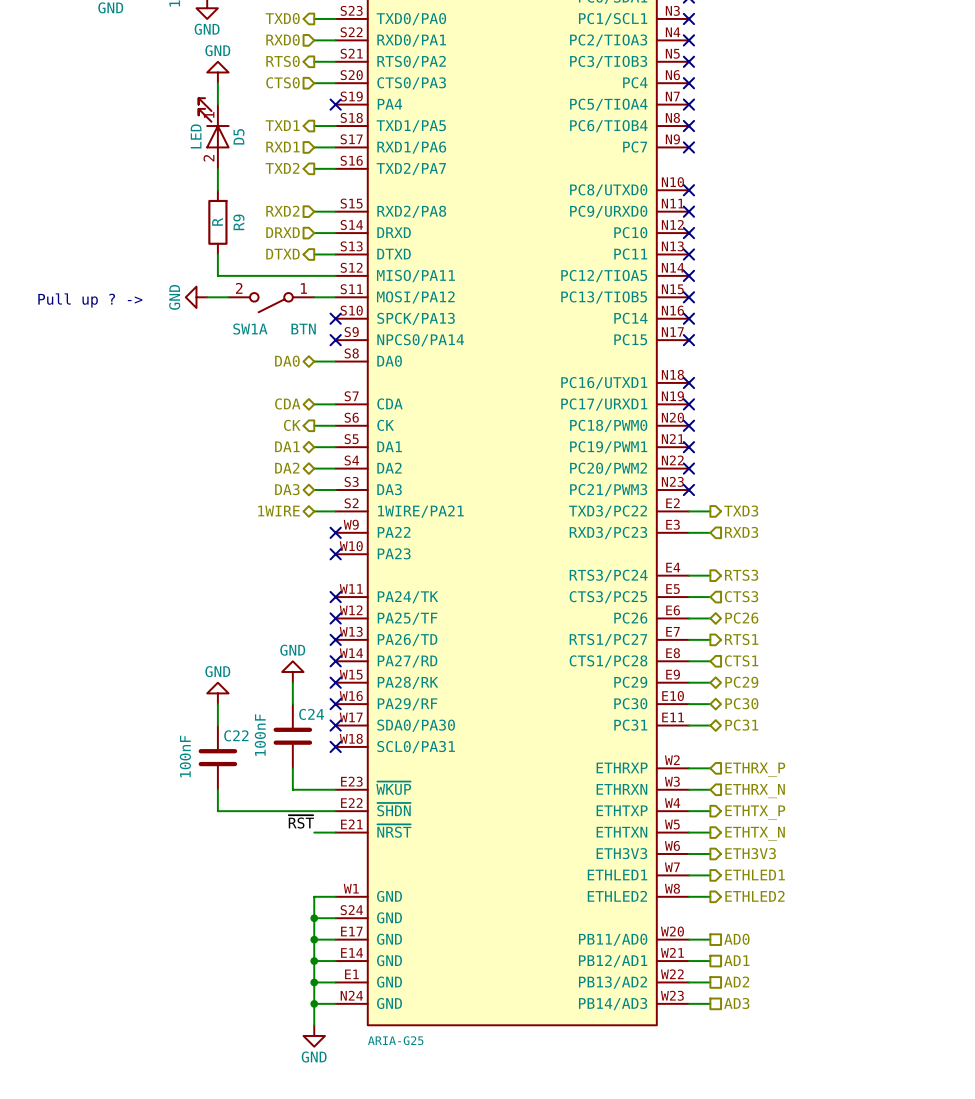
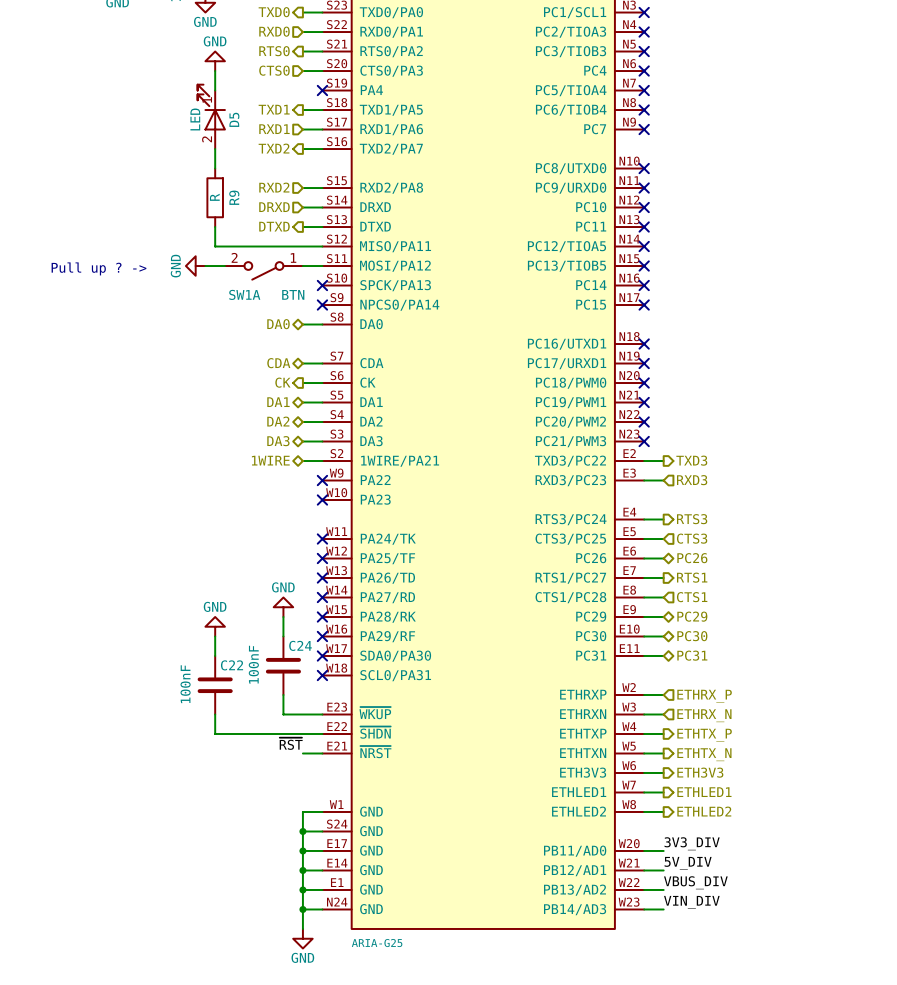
label: none -> 3V3_DIV (692, 843)
hierarchical label: AD0 (736, 939) -> none
label: none -> 5V_DIV (688, 863)
hierarchical label: AD1 (736, 960) -> none
label: none -> VBUS_DIV (695, 882)
hierarchical label: AD2 (736, 981) -> none
label: none -> VIN_DIV (691, 902)
hierarchical label: AD3 (736, 1003) -> none

